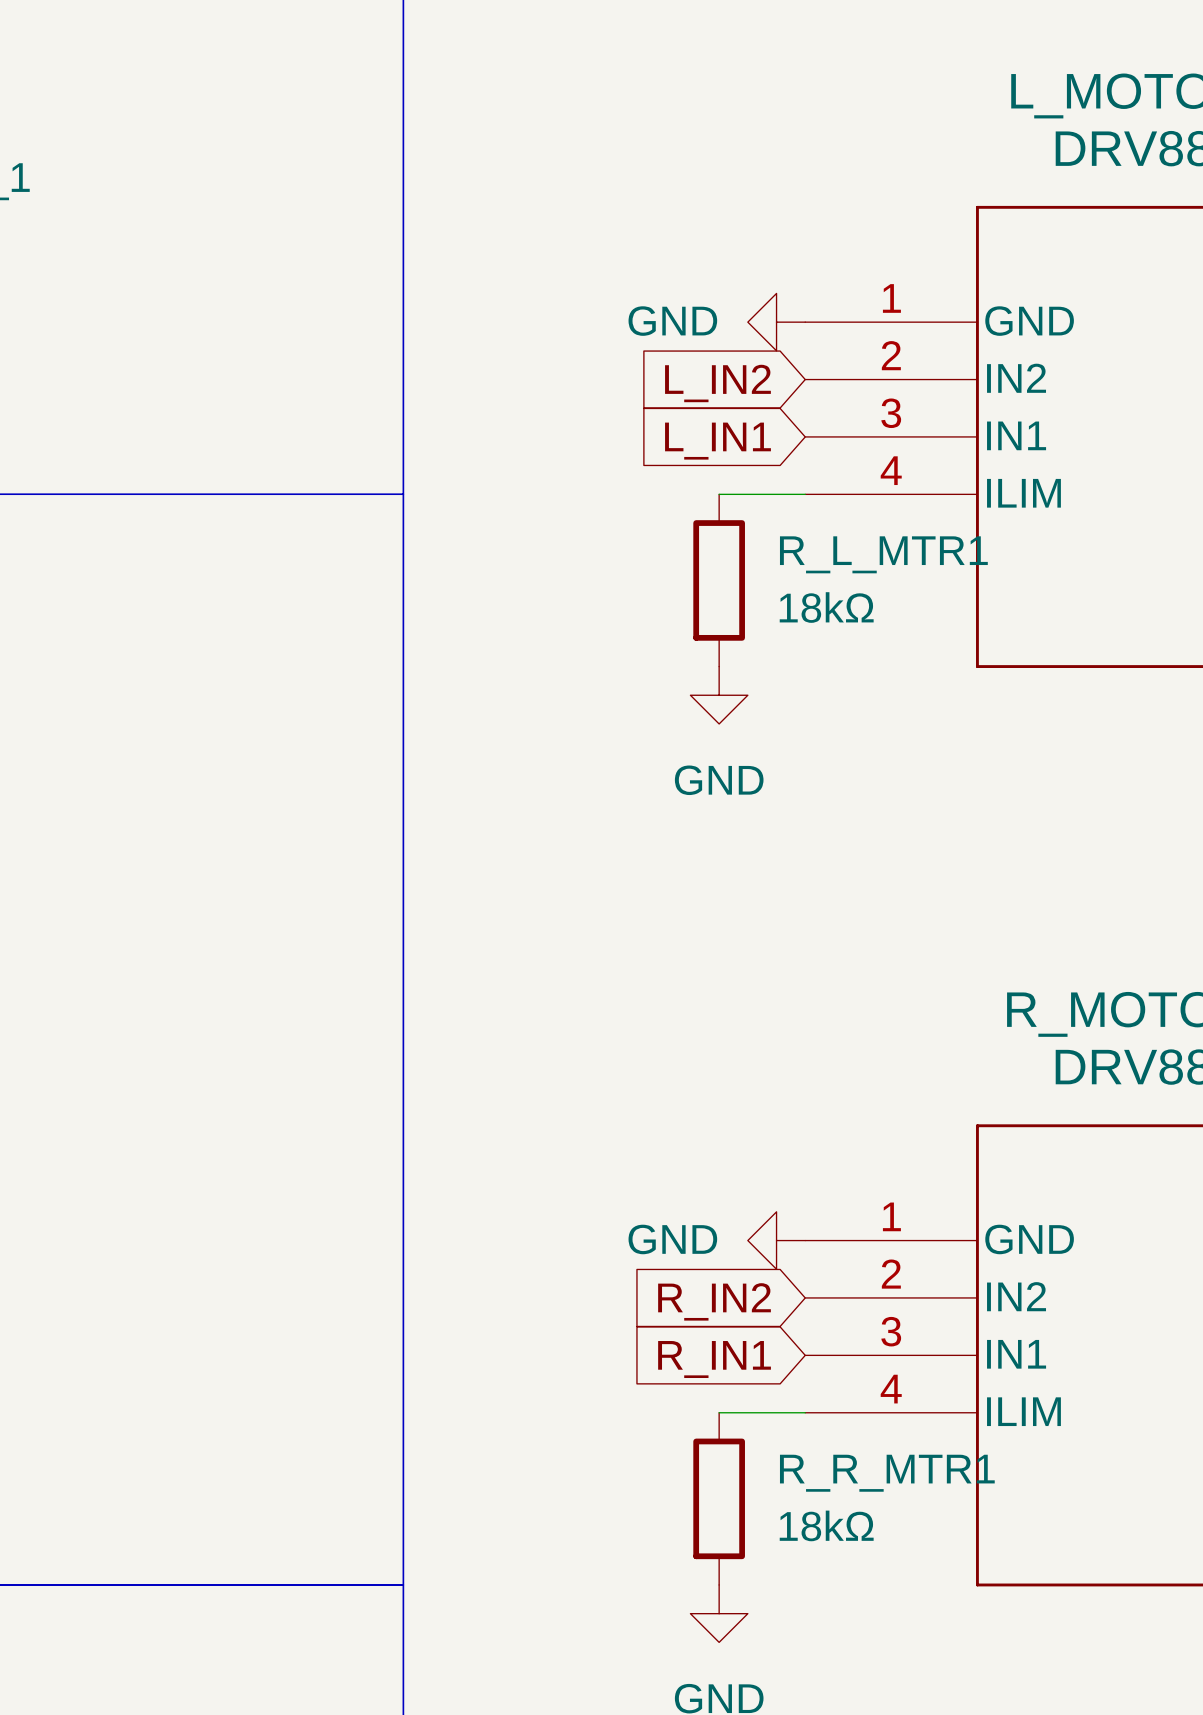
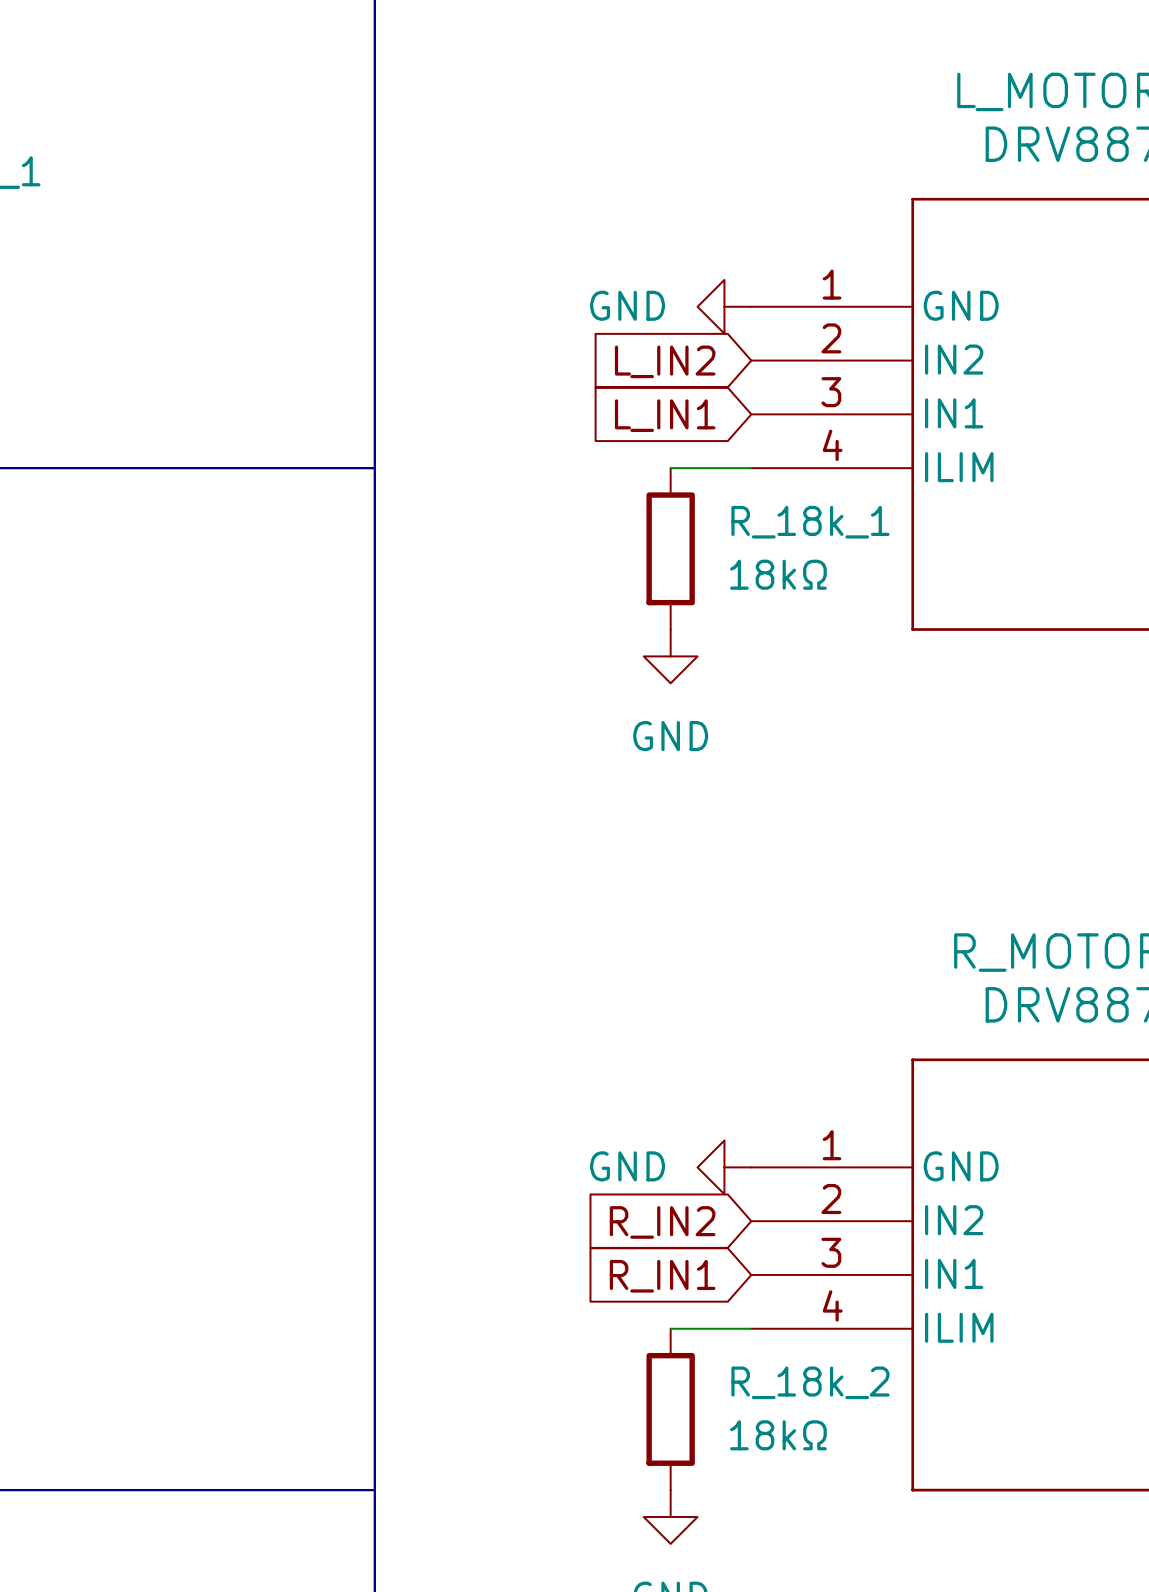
R_L_MTR1 name: R_L_MTR1 (883, 554) -> R_18k_1 (810, 522)
R_R_MTR1 name: R_R_MTR1 (887, 1473) -> R_18k_2 (810, 1382)

